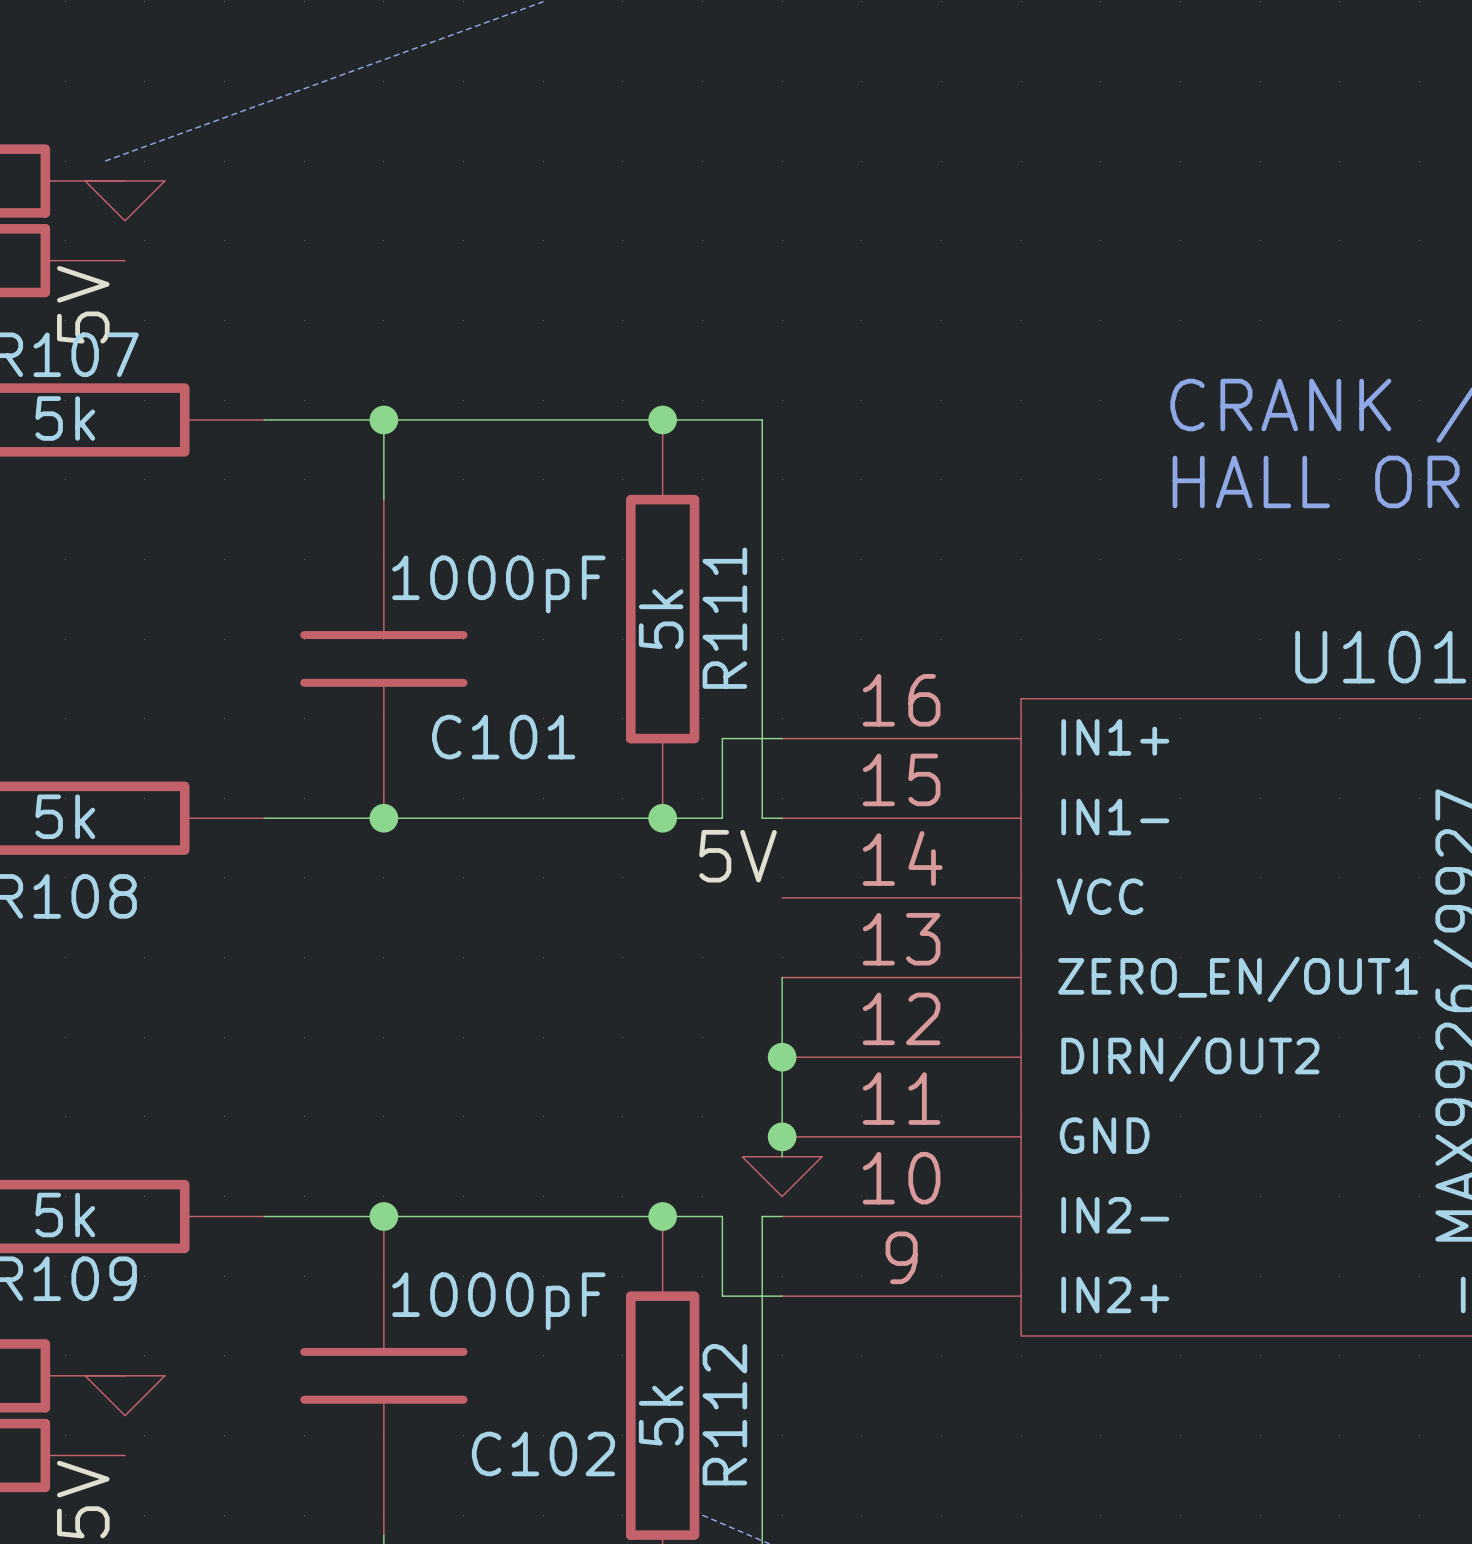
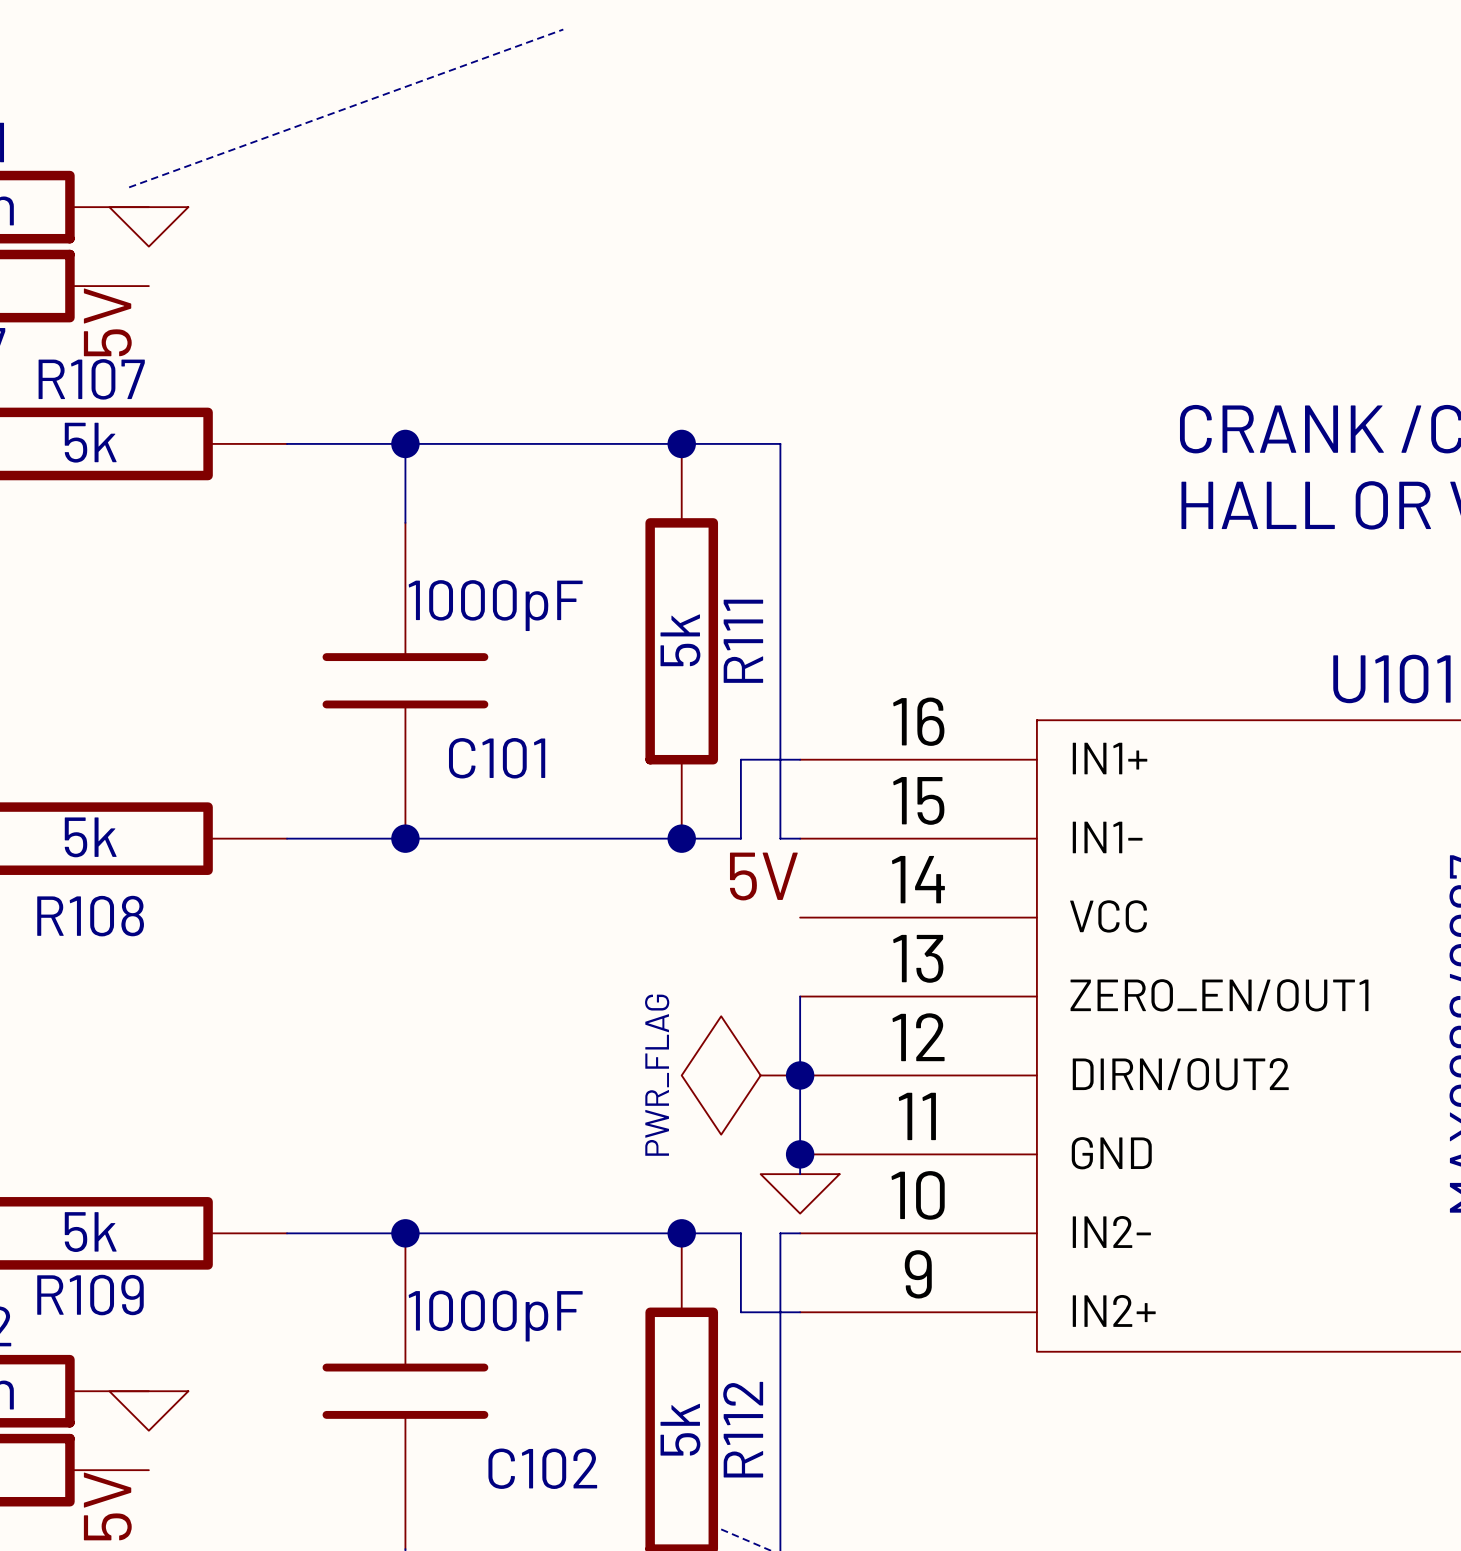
power symbol: none -> PWR_FLAG (740, 1075)

